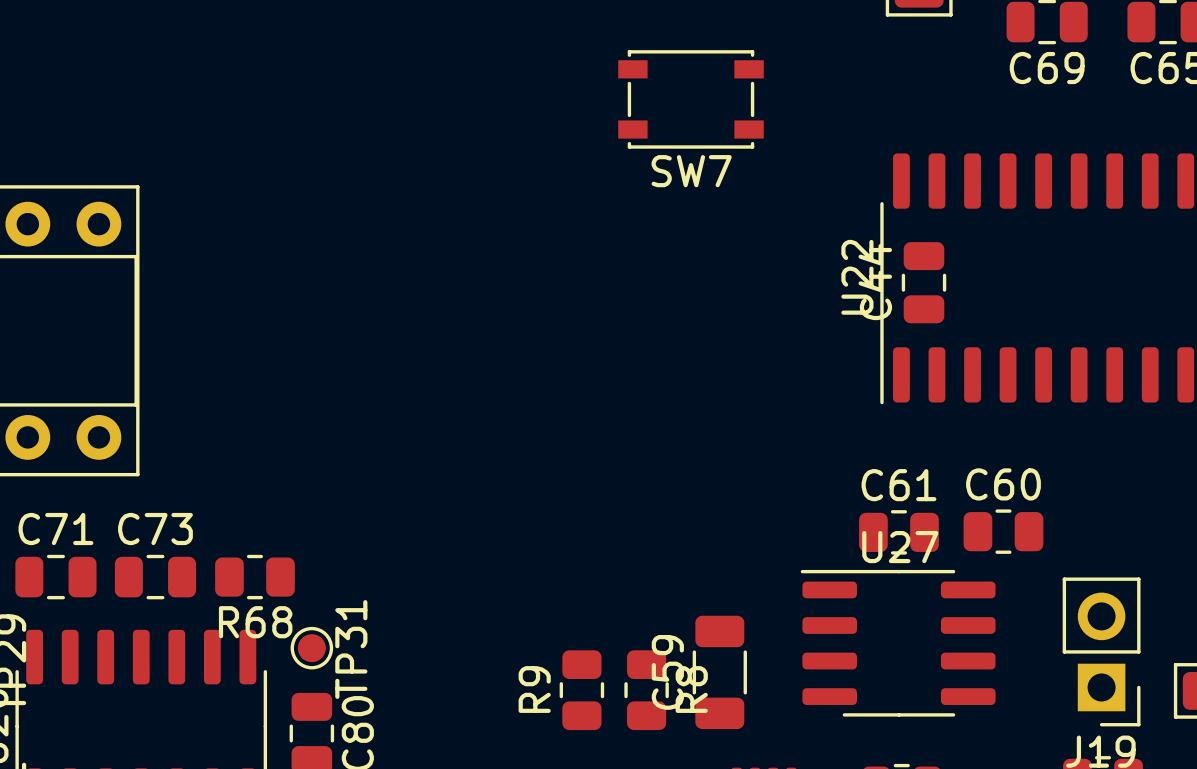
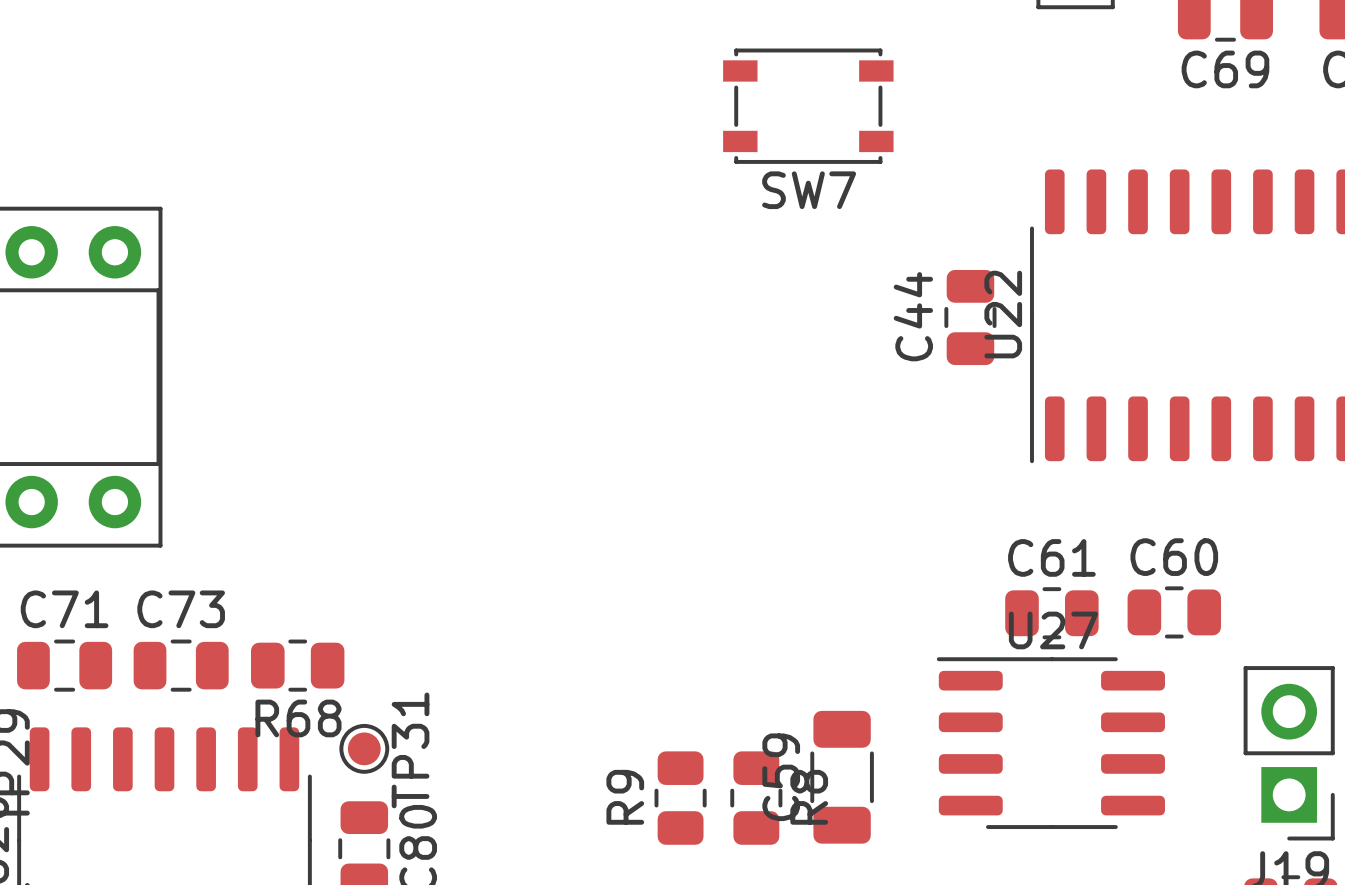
C44 position: (924, 282) -> (970, 317)

